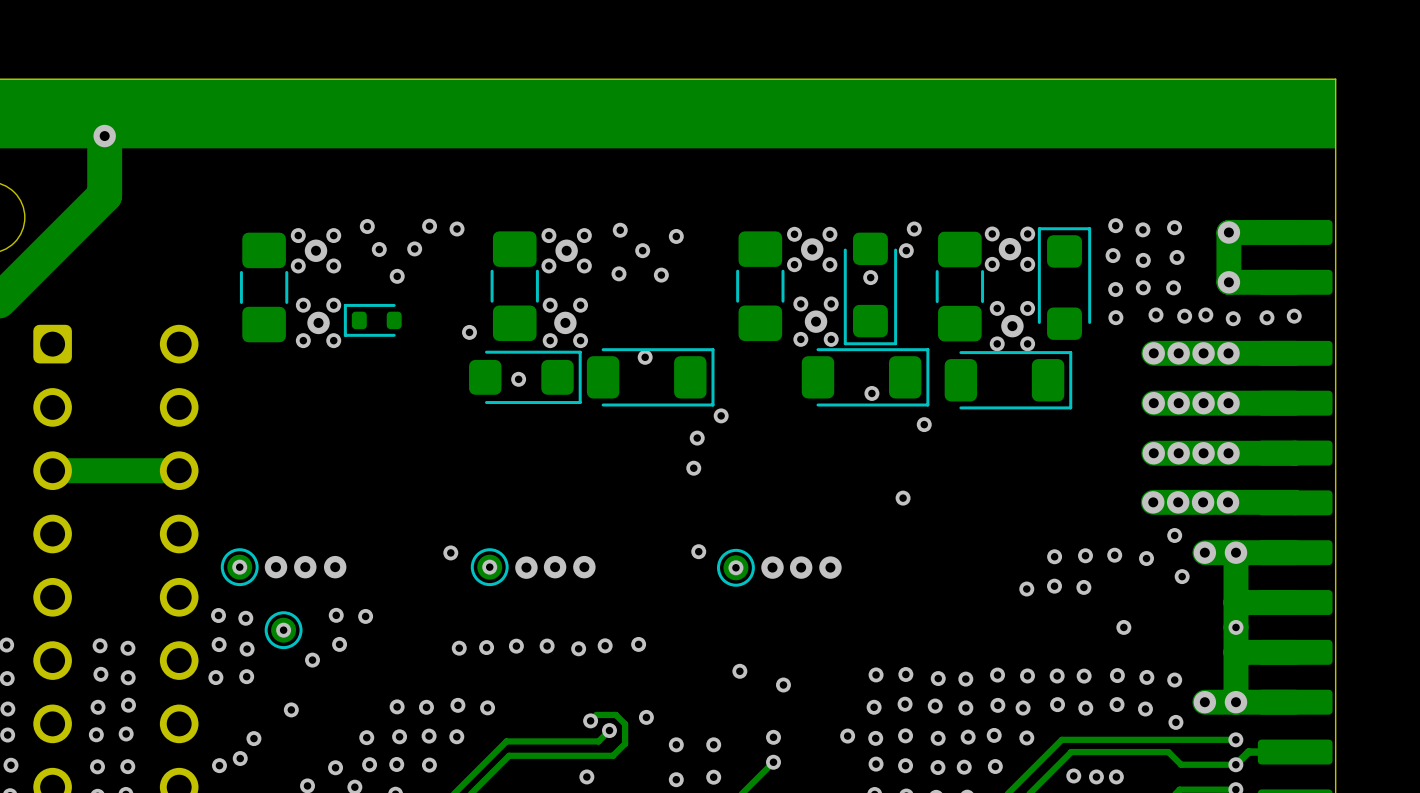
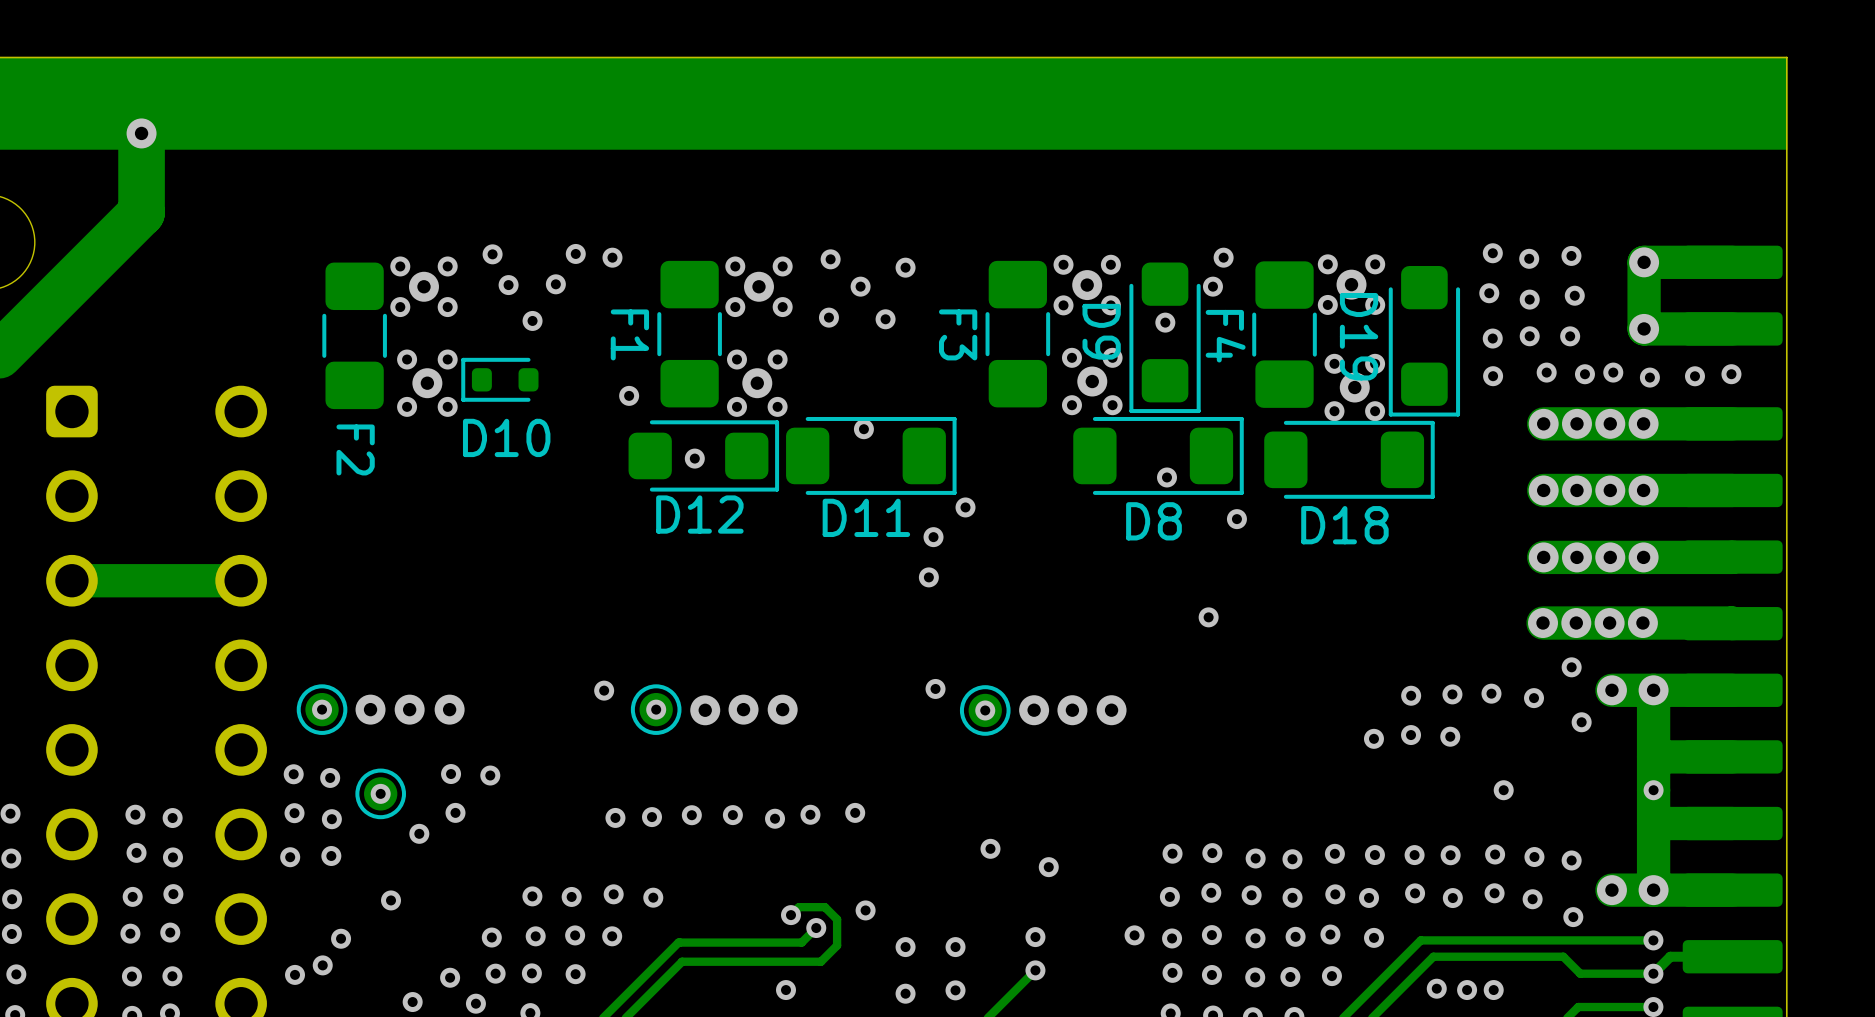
part: (1064, 283) -> none
D9 name: none -> D9 (1101, 331)
F1 name: none -> F1 (629, 334)
F3 name: none -> F3 (958, 334)
F4 name: none -> F4 (1225, 336)
D19: none -> (1424, 341)
D10 name: none -> D10 (506, 437)
F2 name: none -> F2 (355, 449)
D12 name: none -> D12 (699, 514)
D11 name: none -> D11 (866, 517)
D8 name: none -> D8 (1153, 521)
D18 name: none -> D18 (1344, 525)

